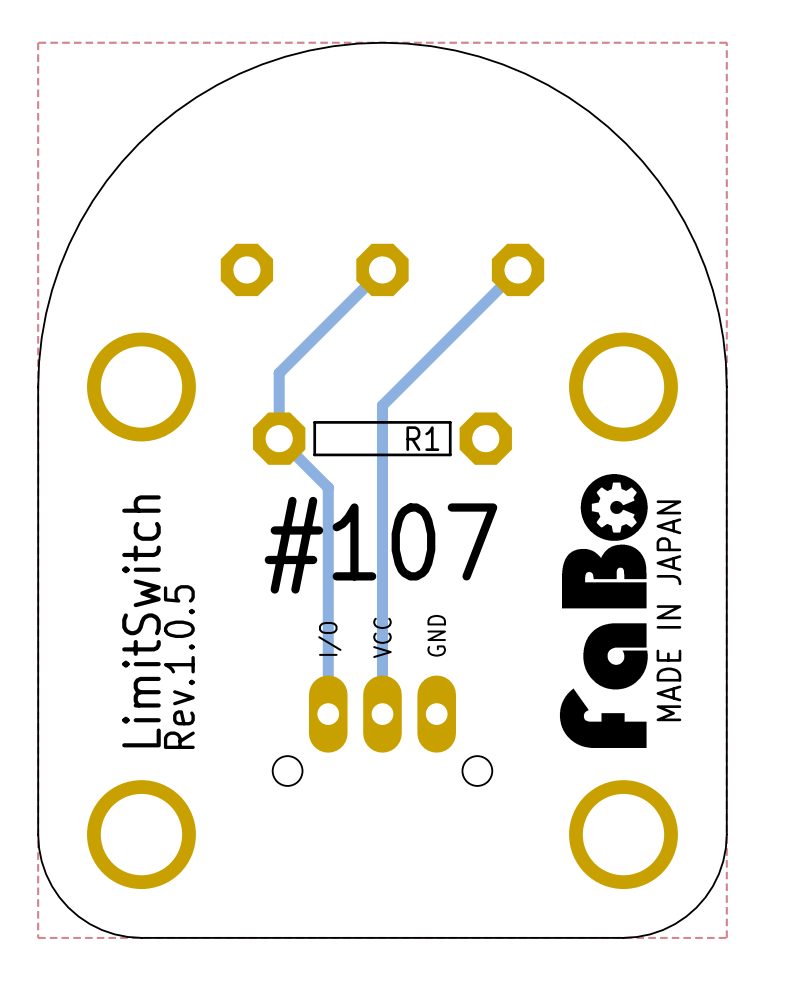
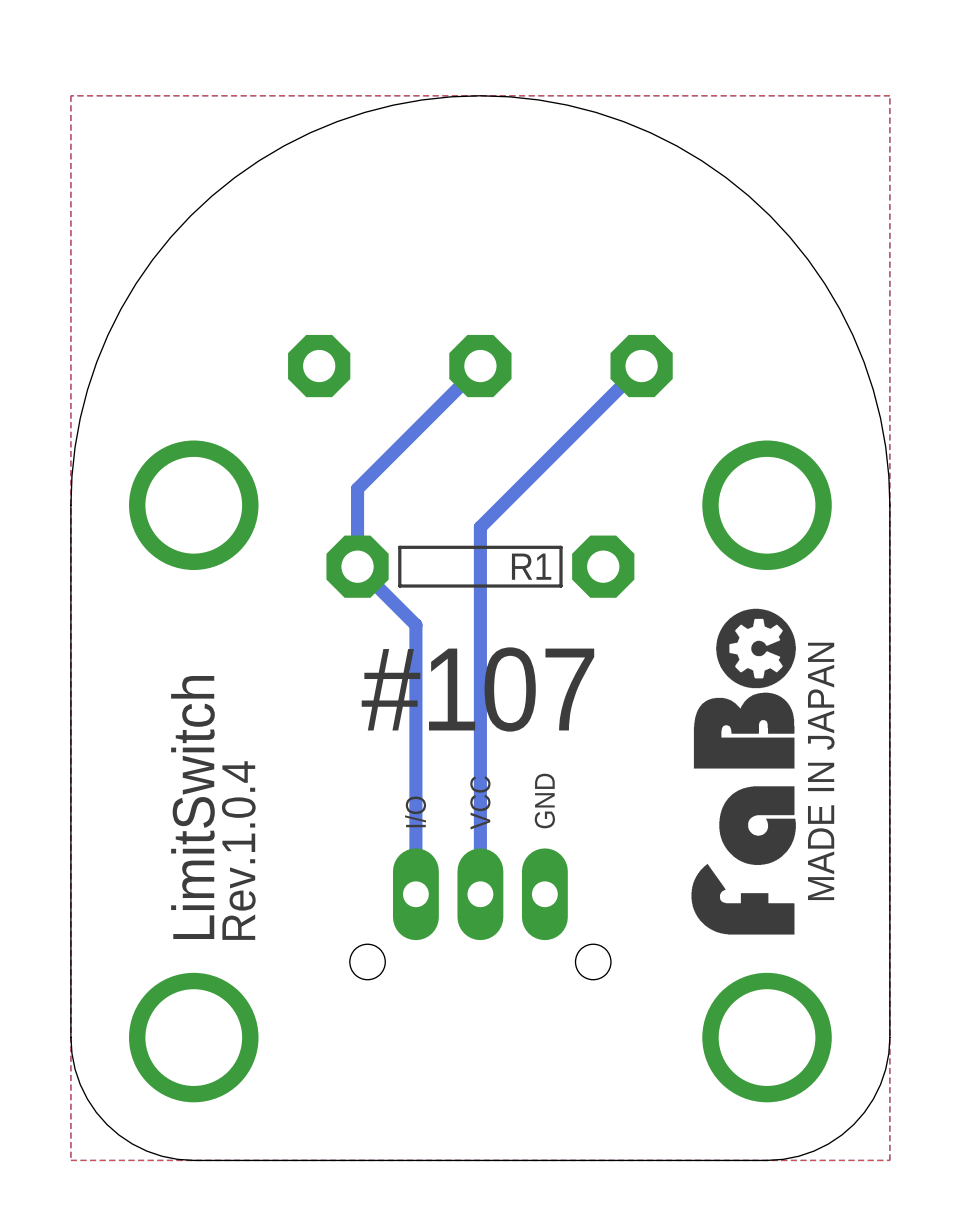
text: Rev.1.0.5 (179, 667) -> Rev.1.0.4 (238, 850)

